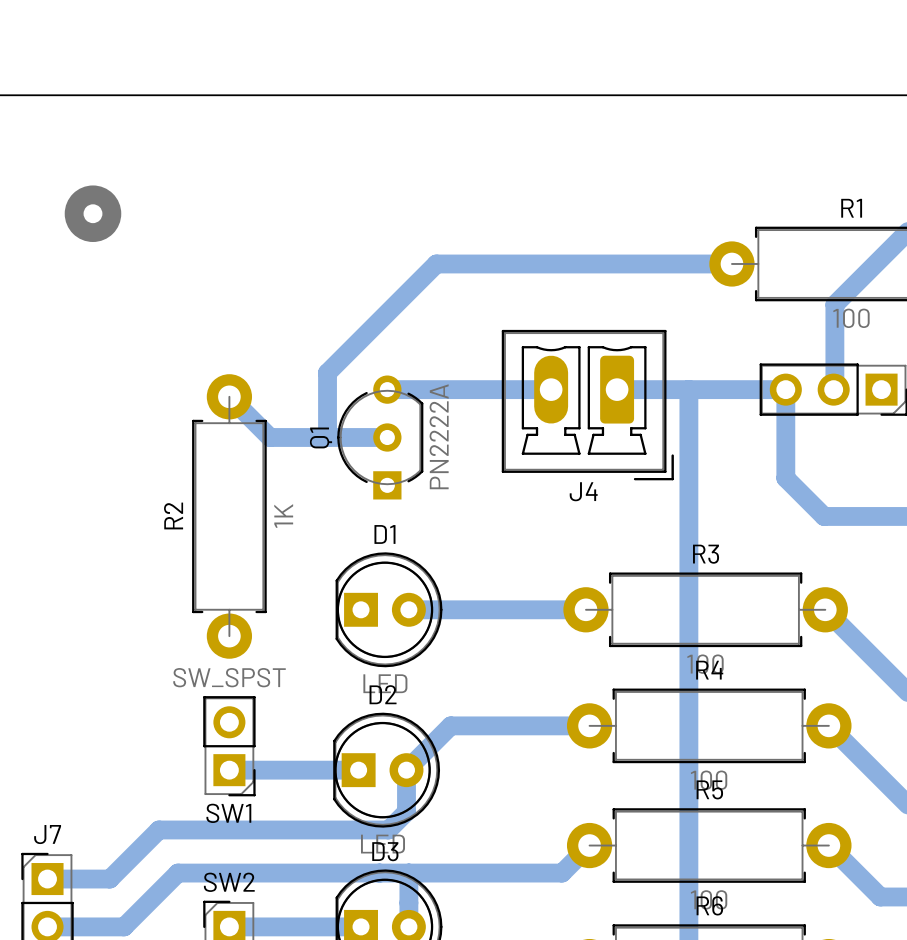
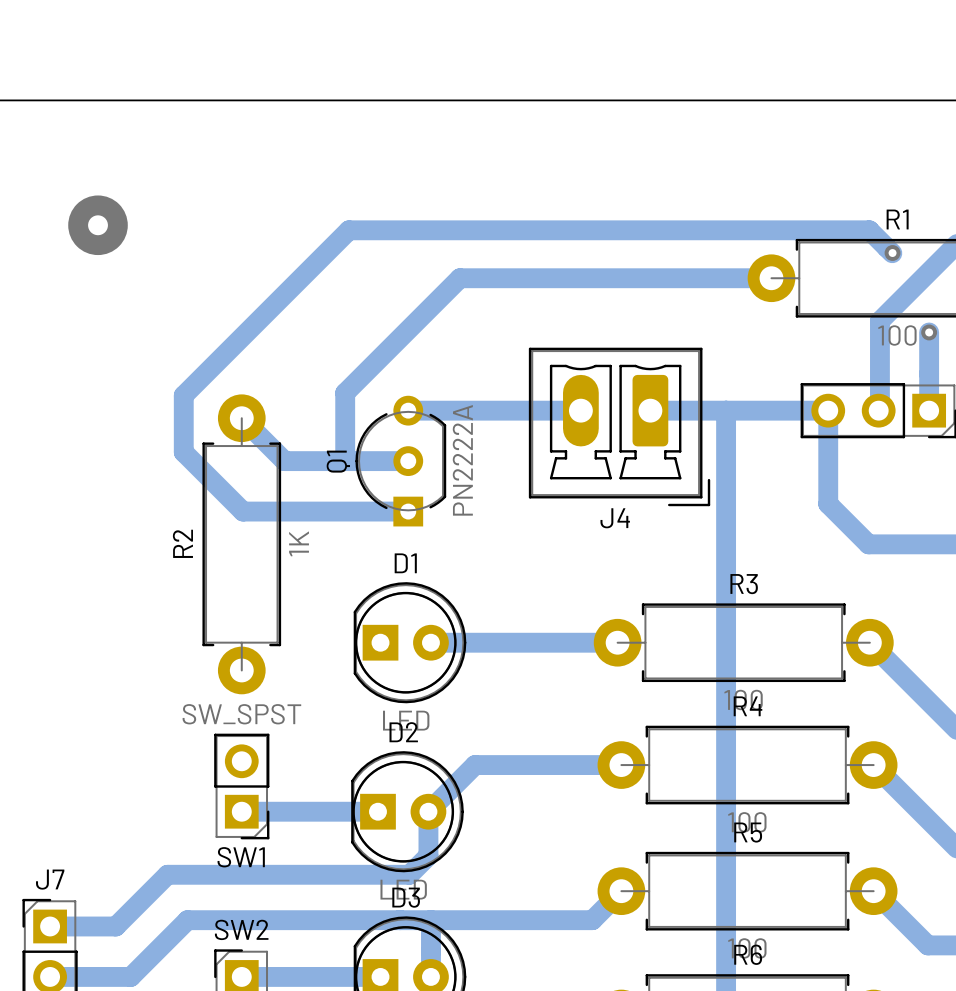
bottom track: none -> (892, 253) (869, 230) (348, 230) (183, 395) (183, 452) (243, 511) (408, 511)
via: none -> (892, 253)
bottom track: none -> (929, 332) (929, 410)
via: none -> (929, 332)

